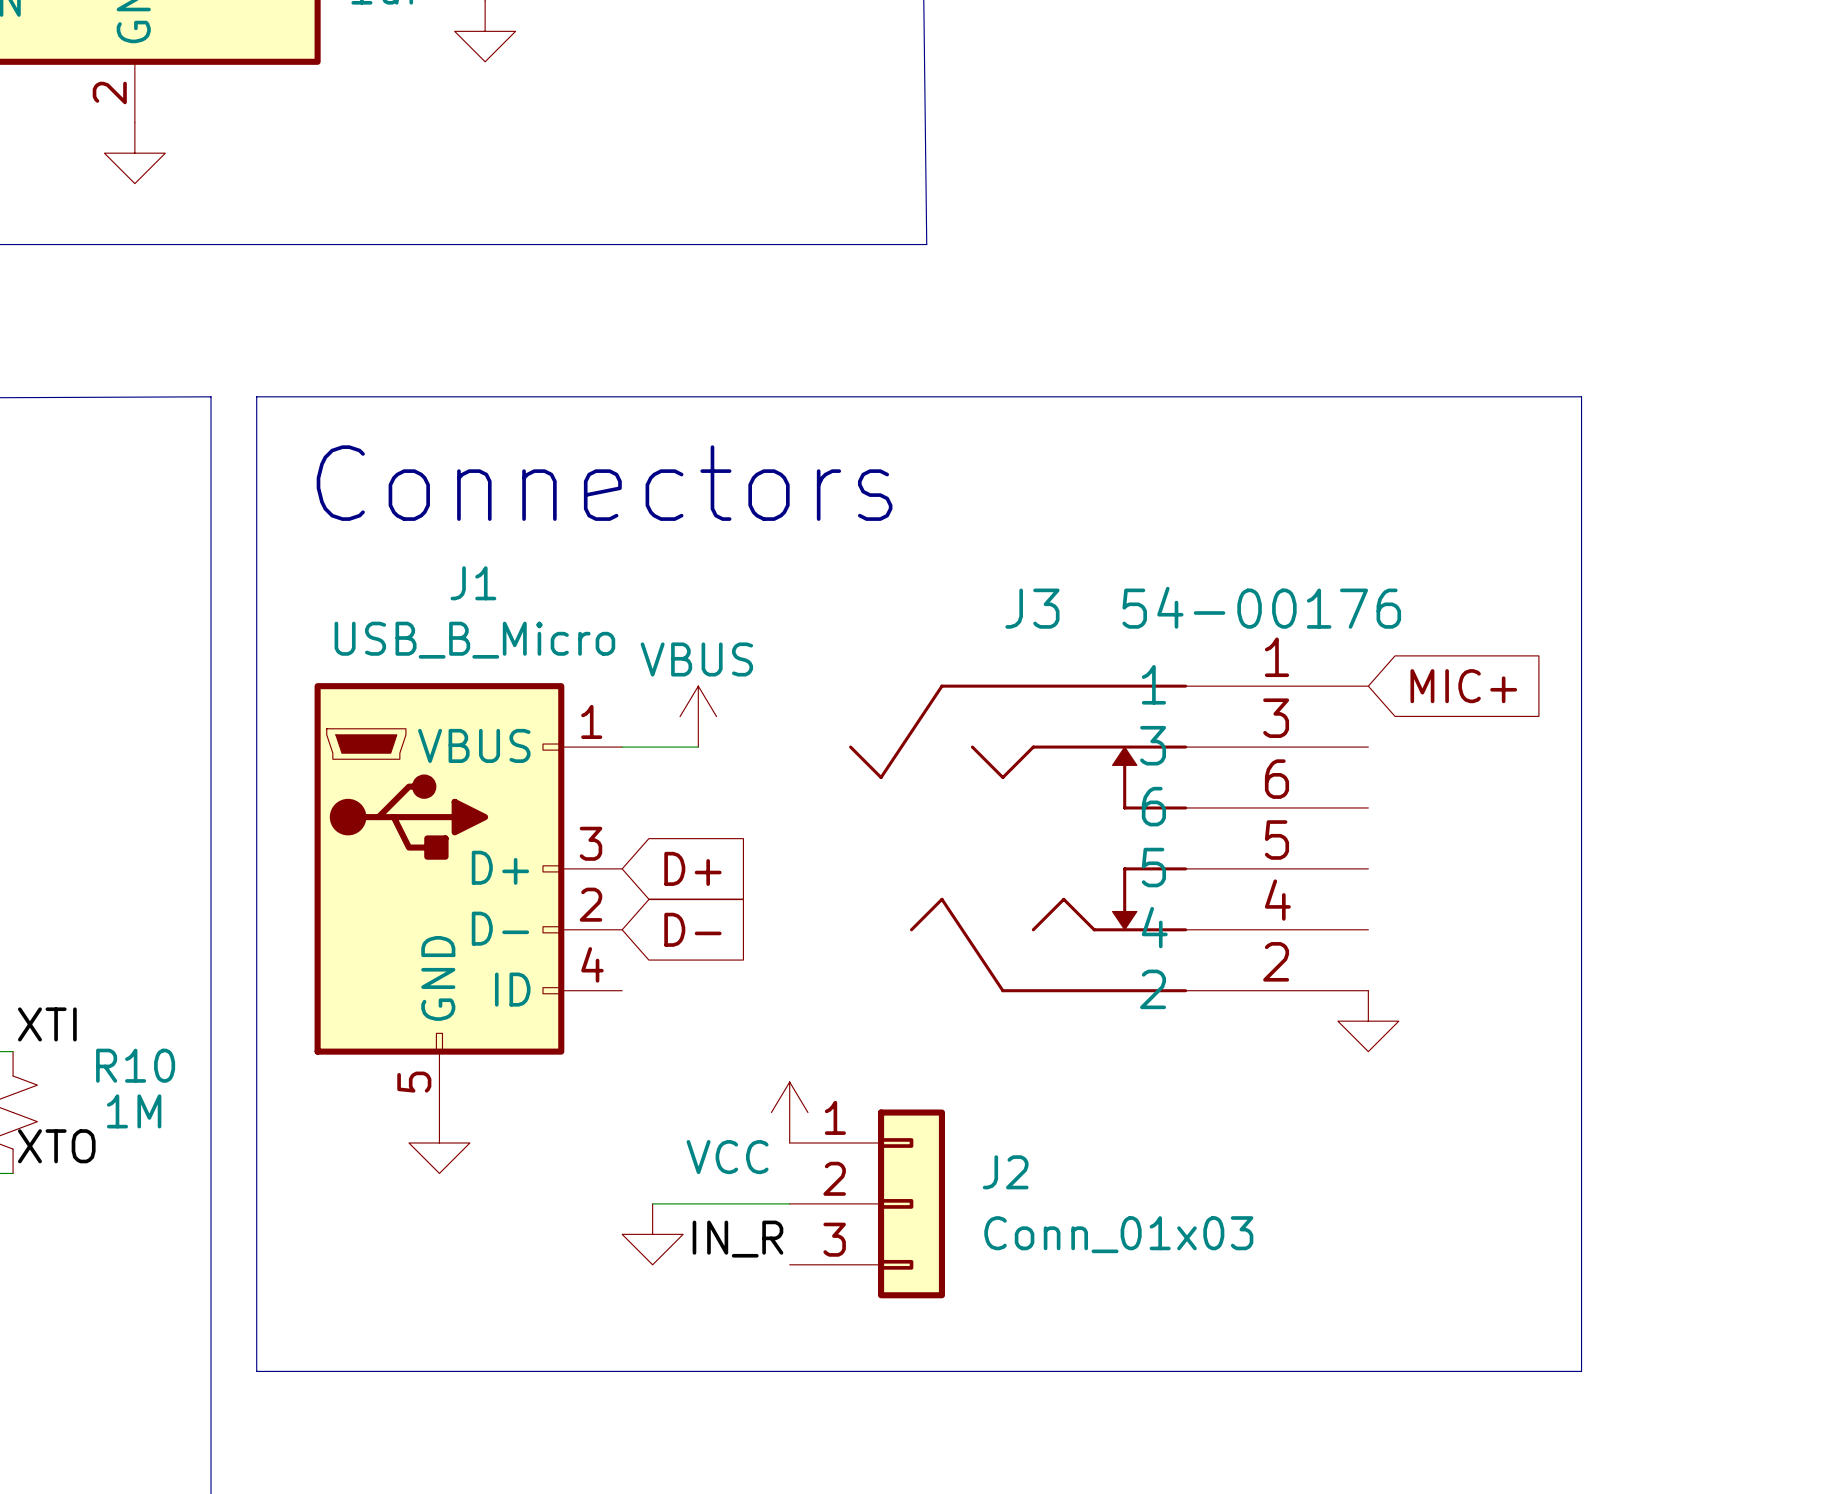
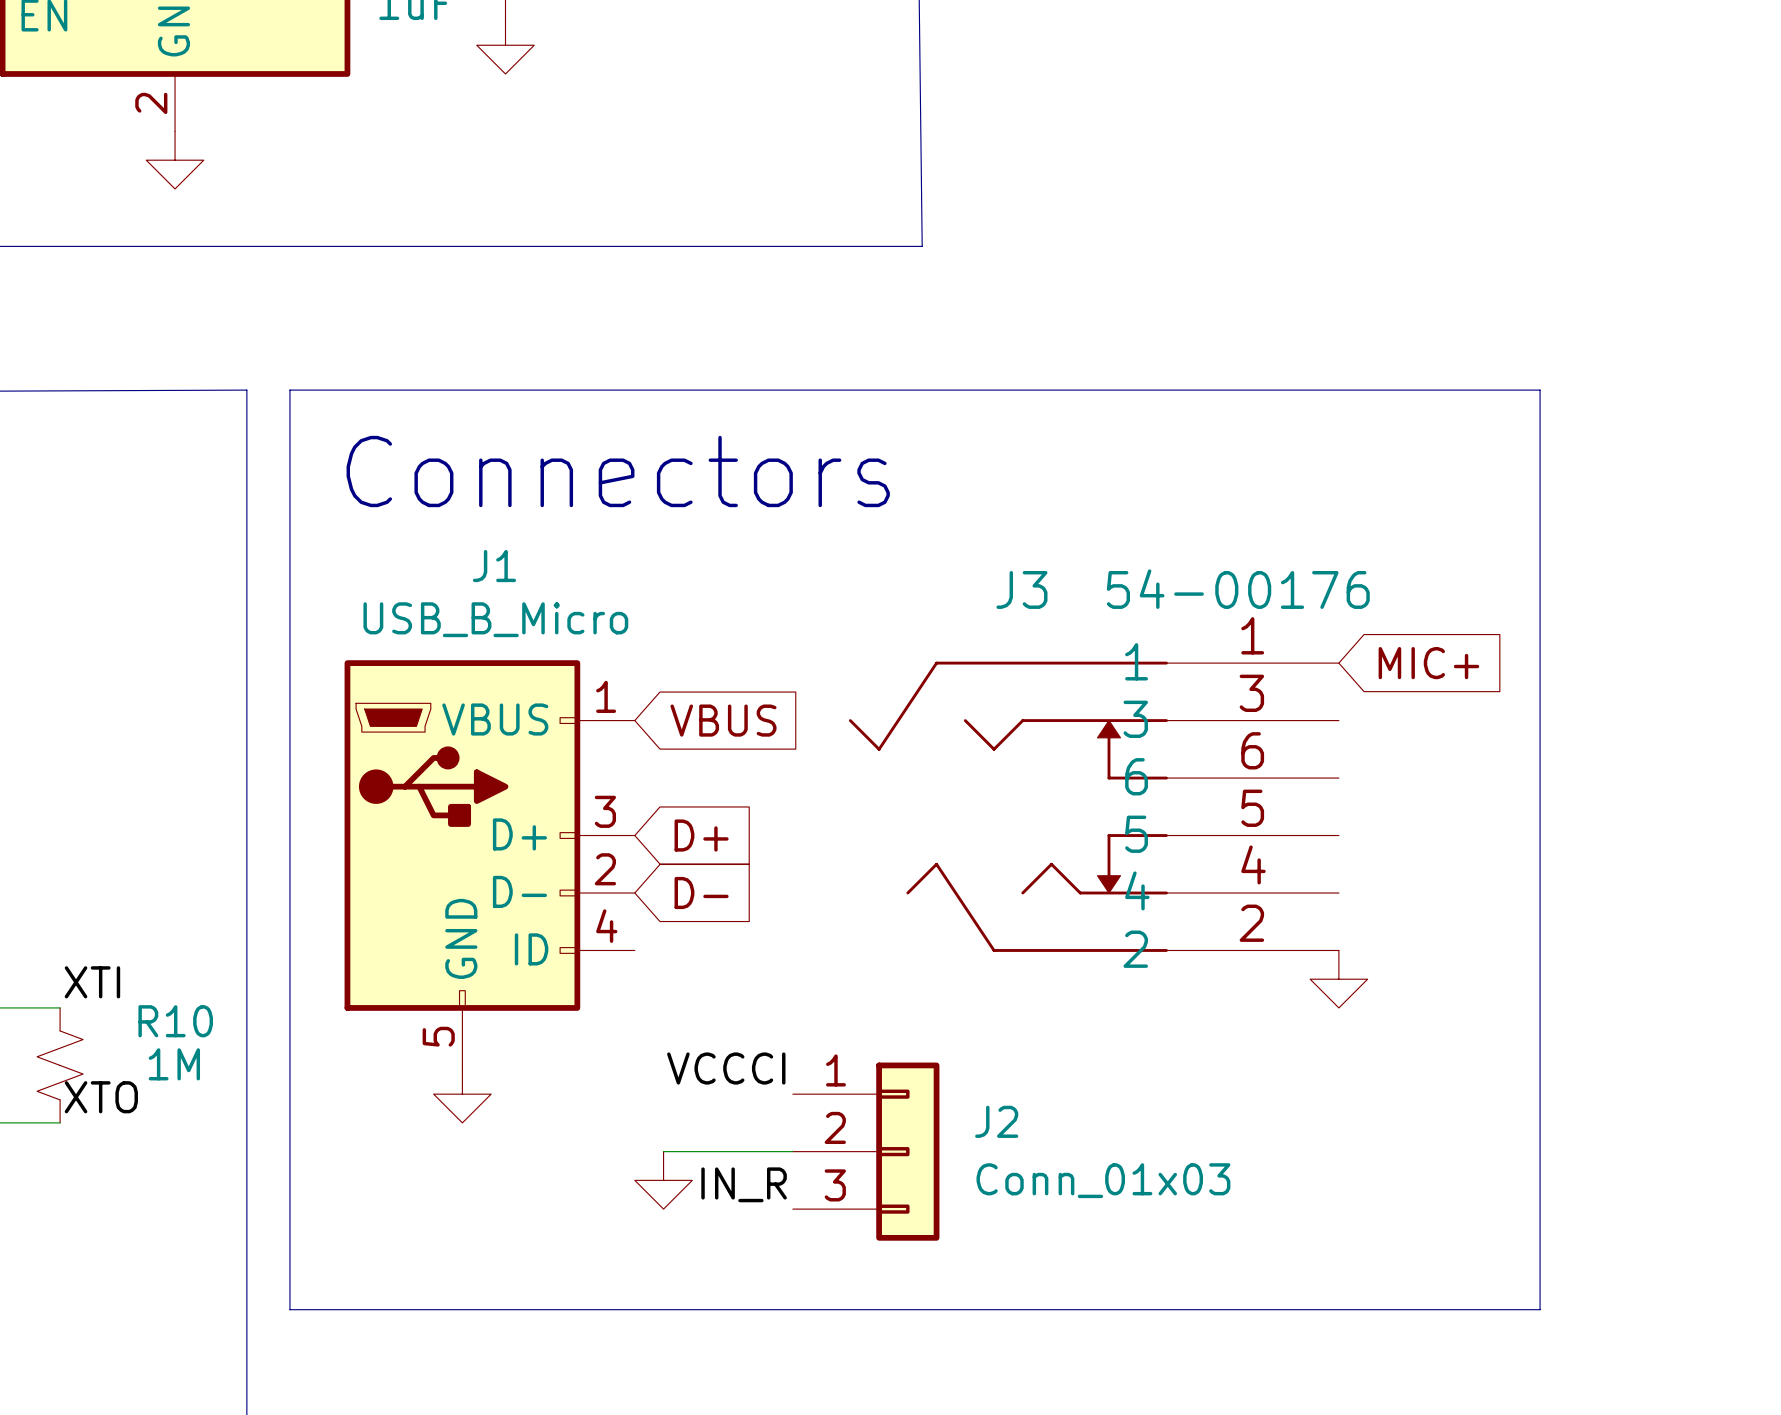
power symbol: VBUS (698, 716) -> none
wire: (622, 747) (698, 747) -> none
global label: none -> VBUS (723, 720)
power symbol: VCC (789, 1112) -> none
label: none -> VCCCI (726, 1068)

